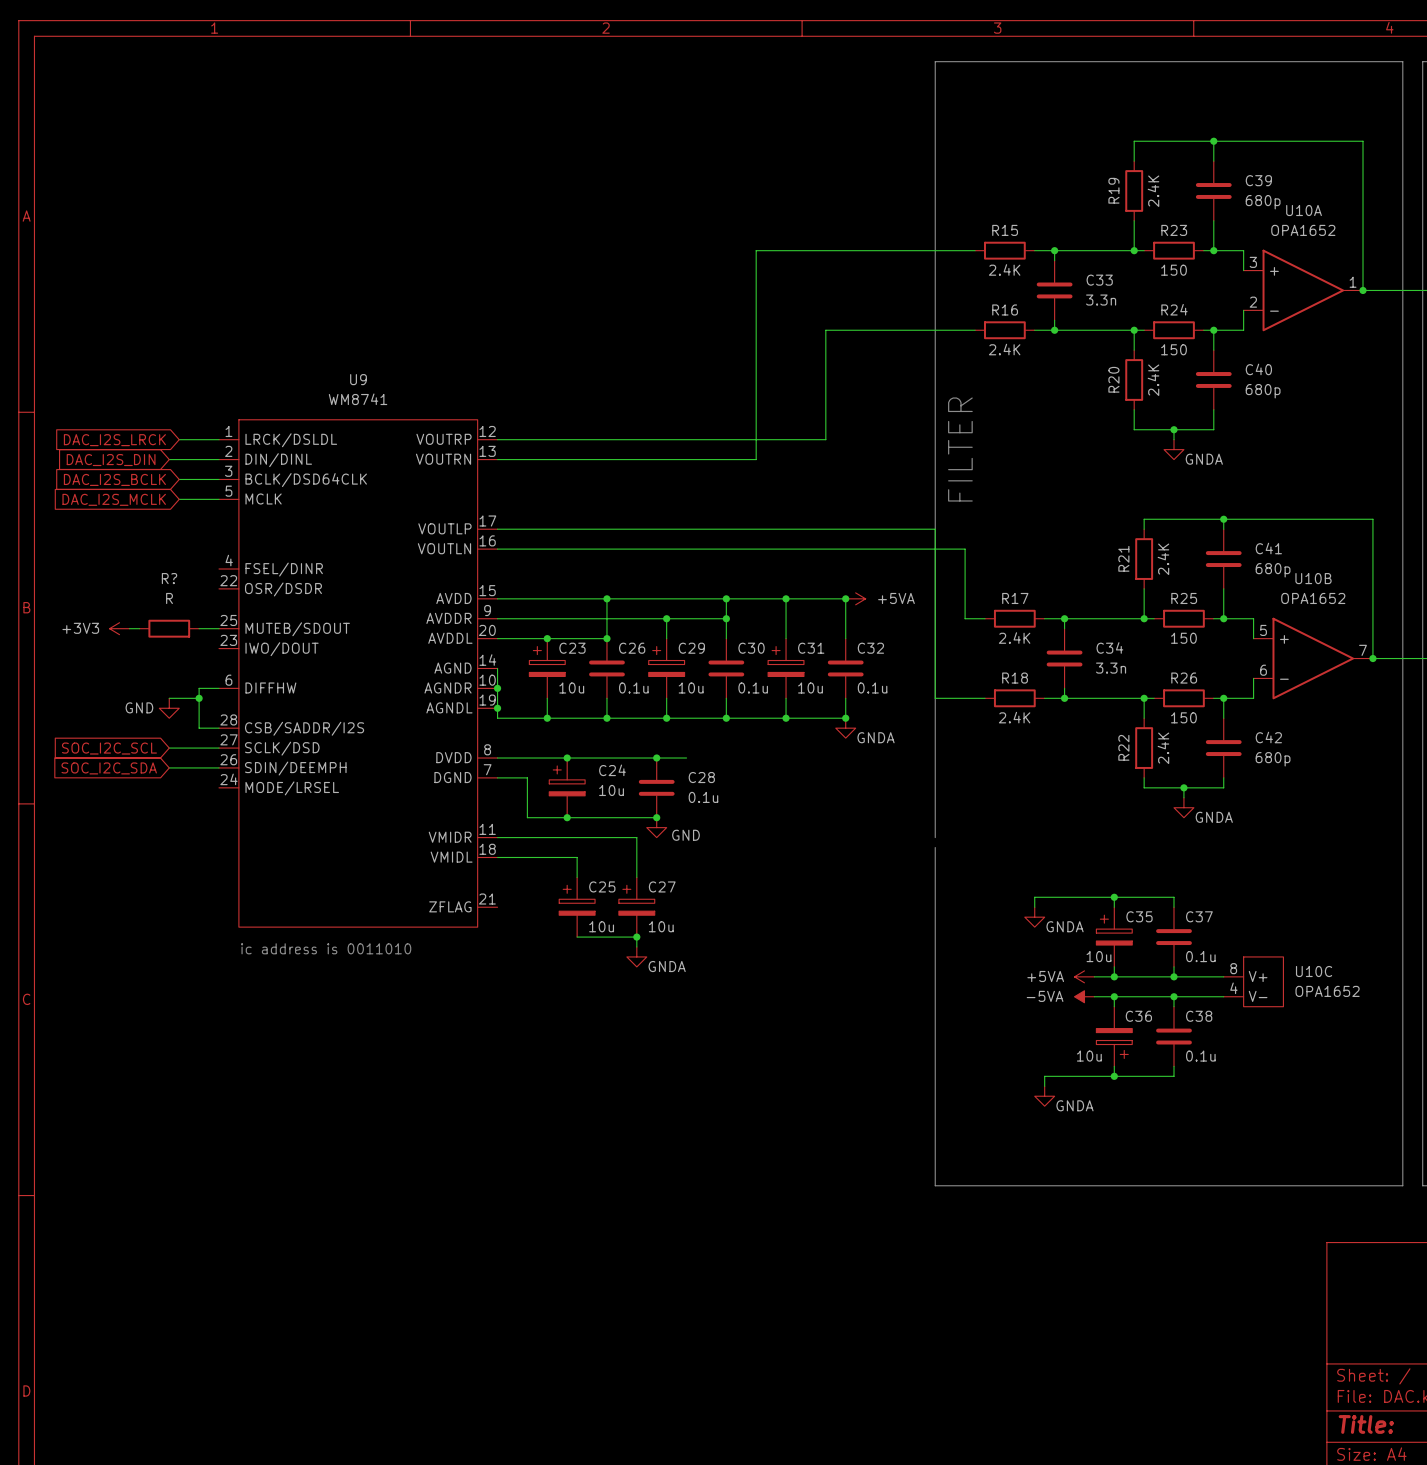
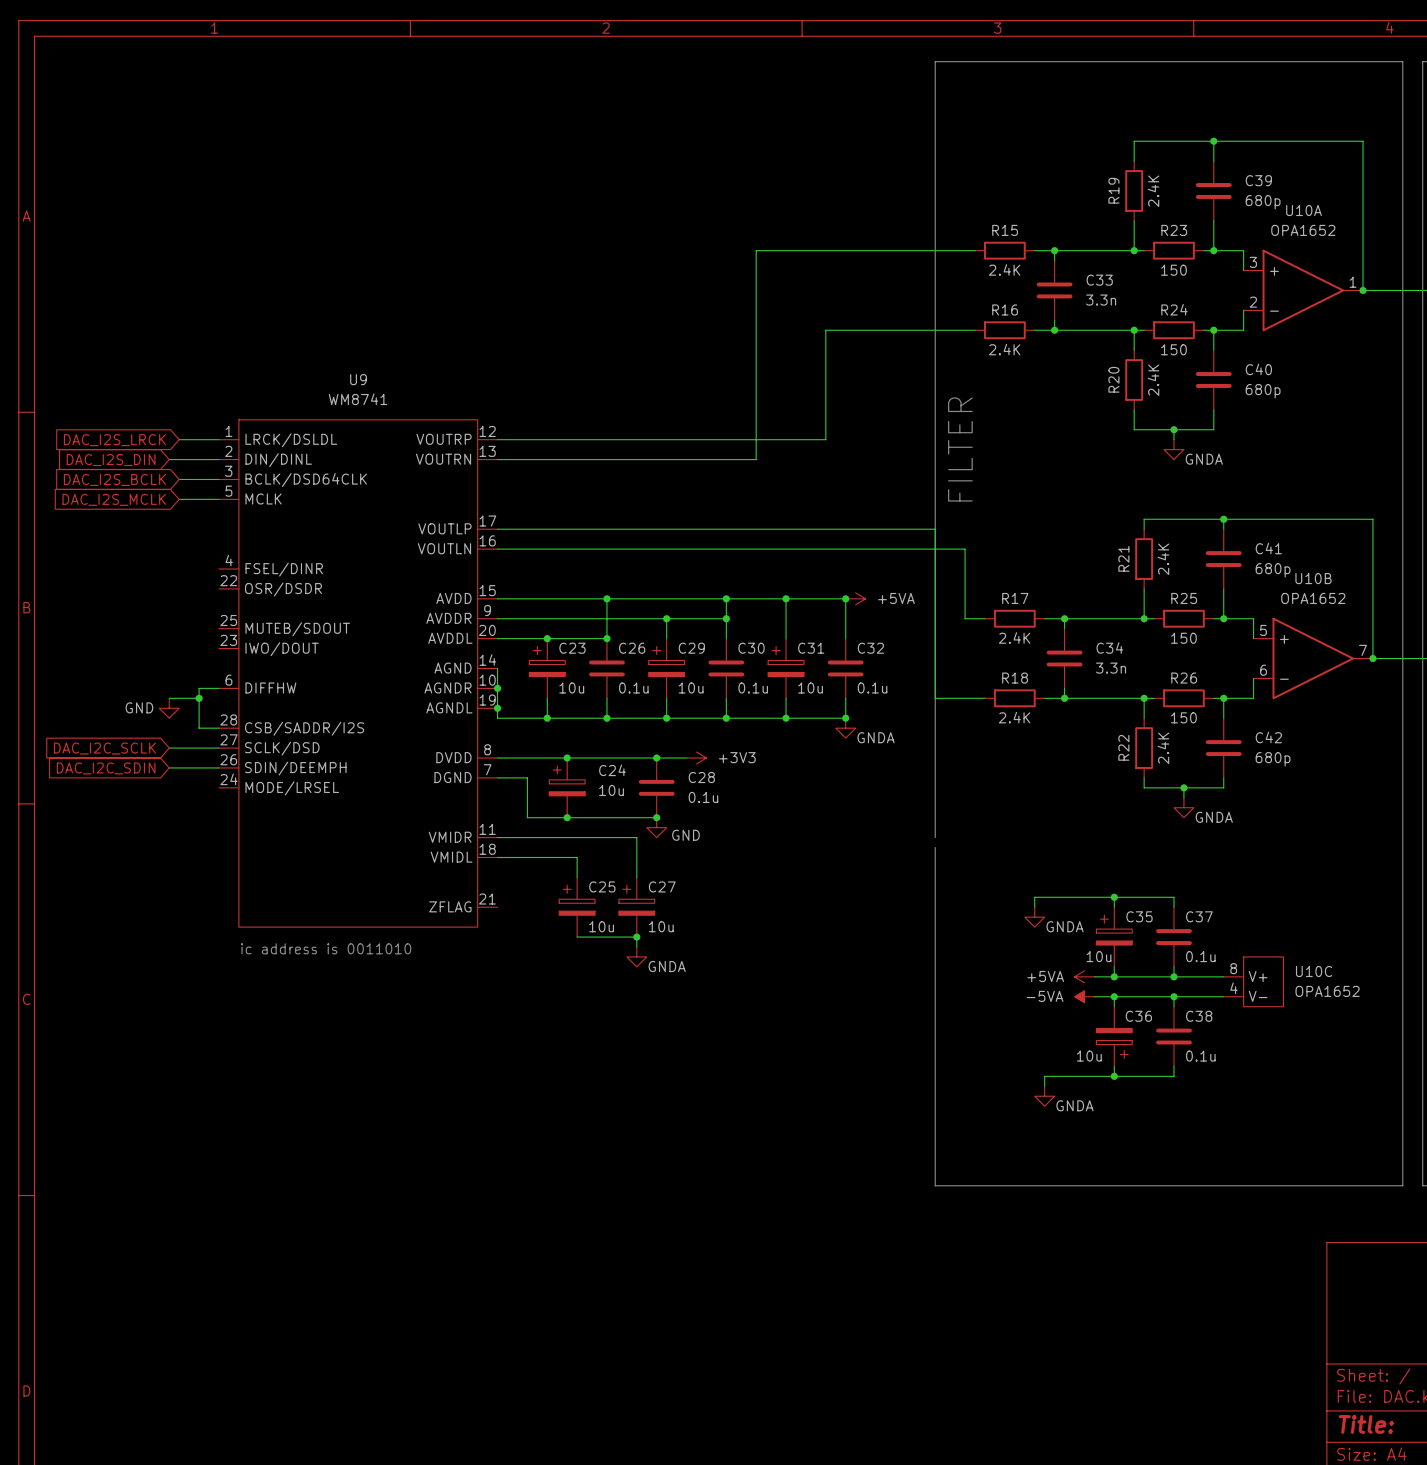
power symbol: +3V3 (119, 628) -> none
wire: (129, 628) (139, 628) -> none
R?: R (169, 628) -> none
wire: (199, 628) (219, 628) -> none
global label: SOC_I2C_SCL (109, 748) -> DAC_I2C_SCLK (104, 748)
power symbol: none -> +3V3 (696, 758)
global label: SOC_I2C_SDA (109, 768) -> DAC_I2C_SDIN (106, 768)

